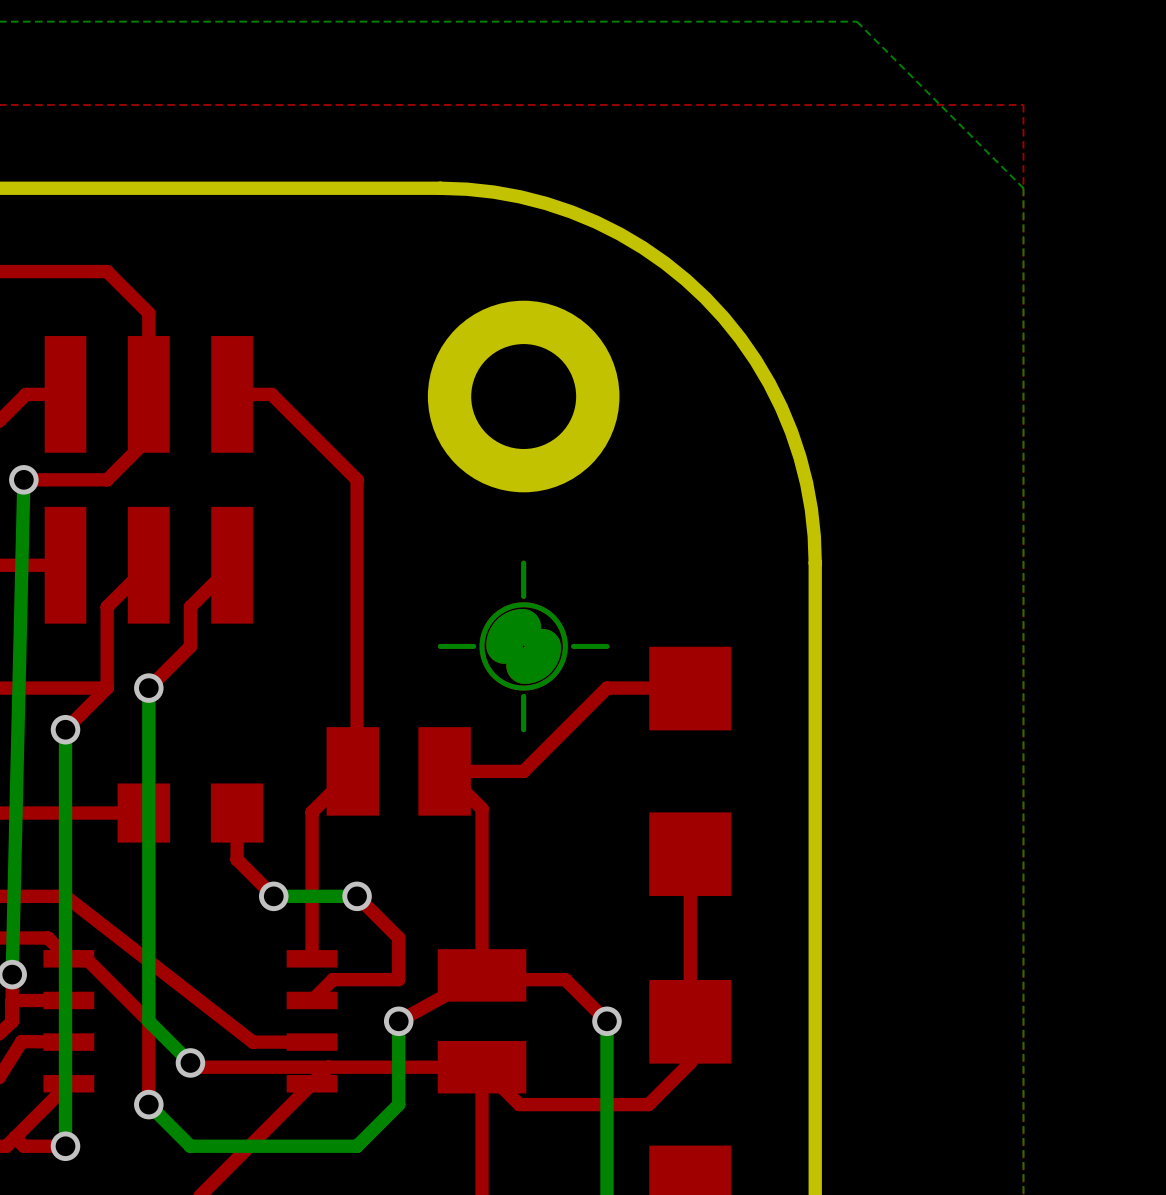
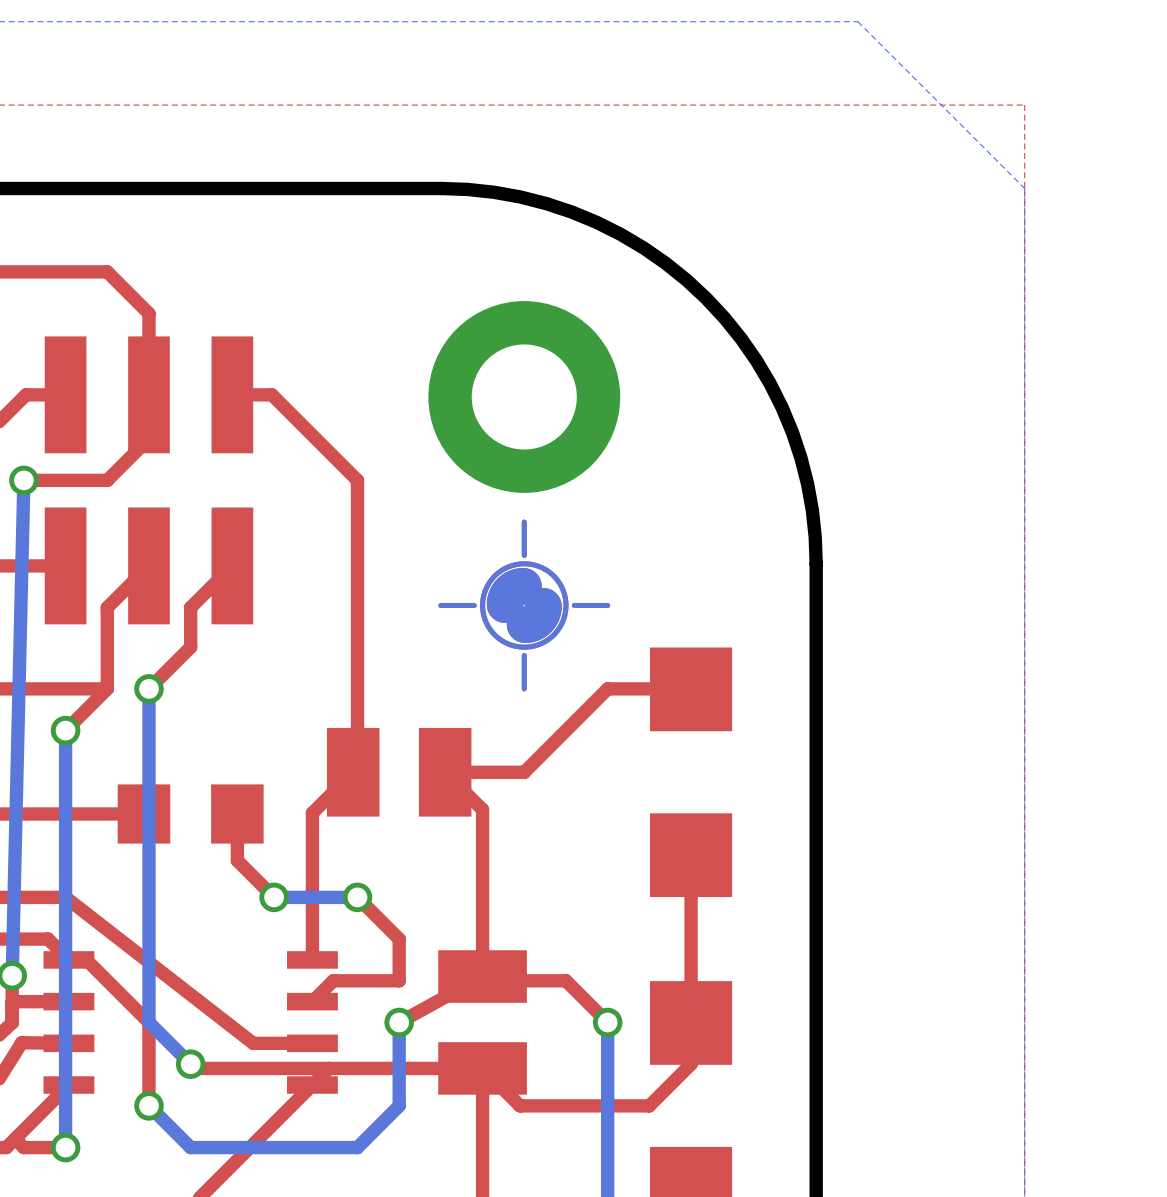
drawing position: (523, 646) -> (524, 605)

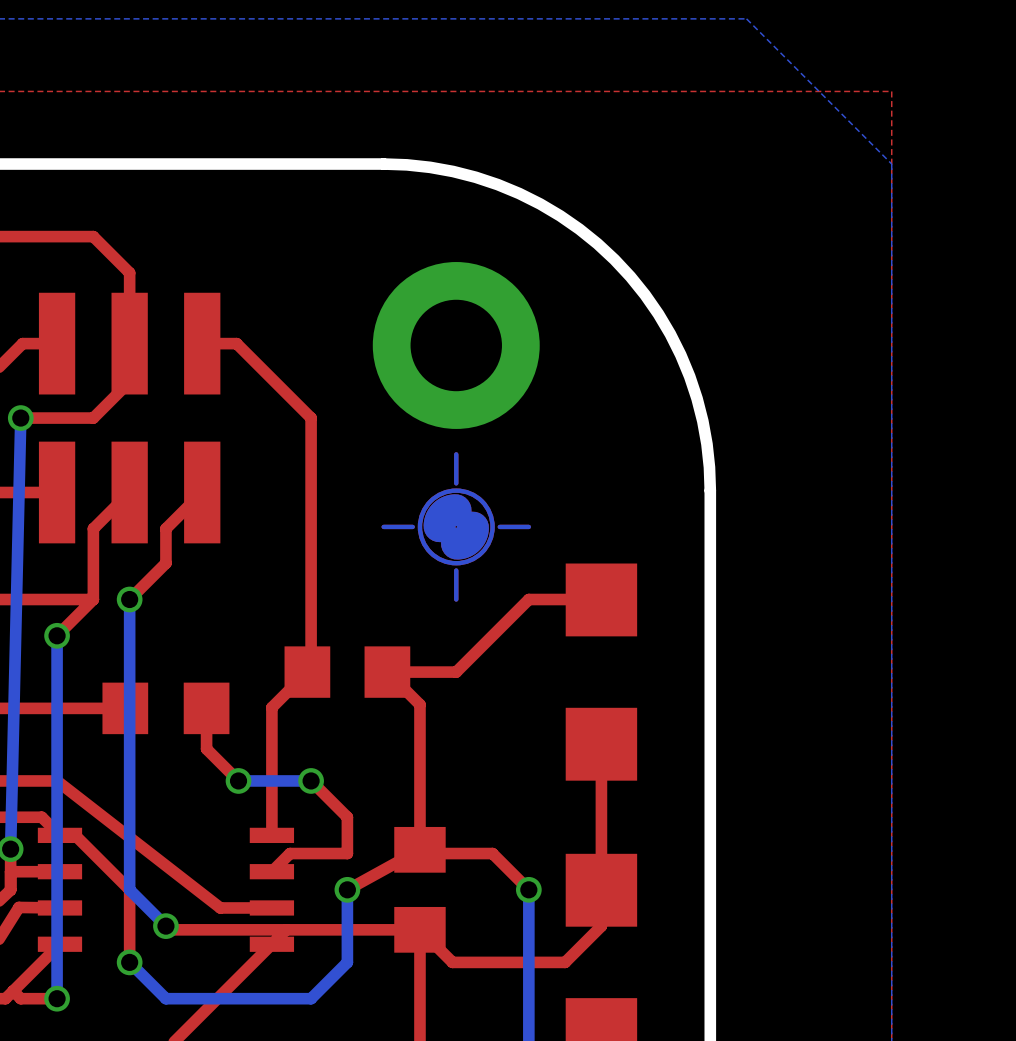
part footprint: [326, 727, 472, 817] -> [284, 646, 411, 698]
part footprint: [438, 950, 527, 1095] -> [394, 826, 446, 953]

